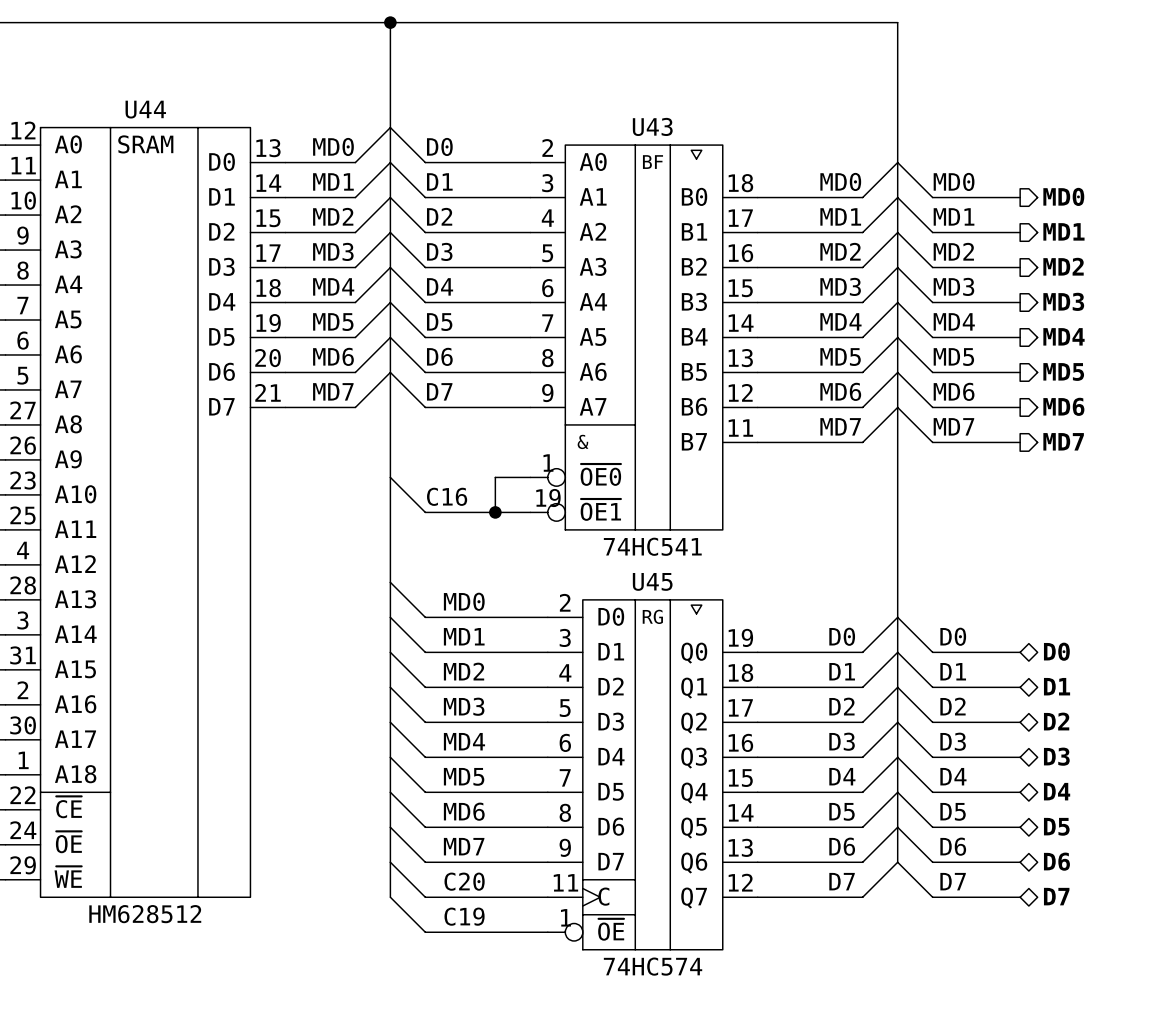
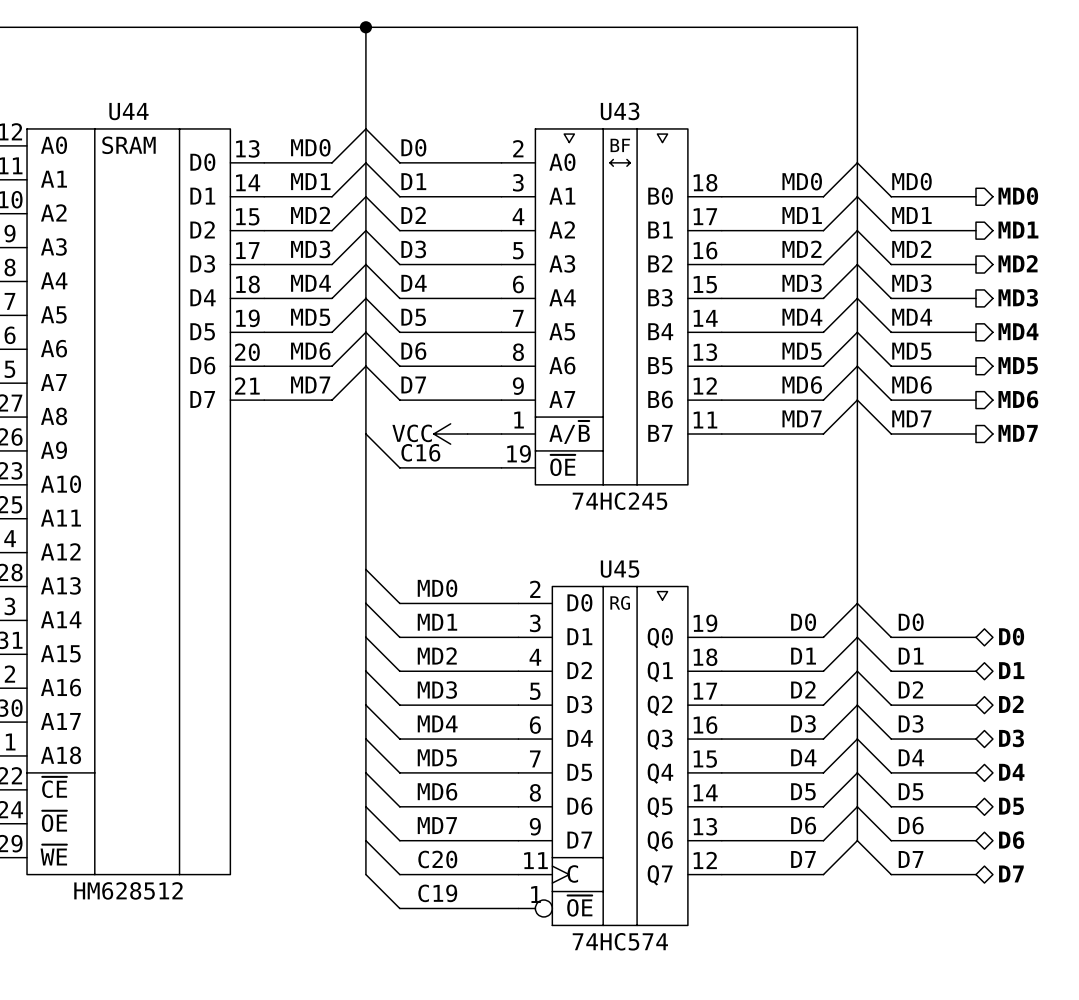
U43 symbol: [530, 145, 758, 530] -> [501, 128, 722, 485]
power symbol: none -> VCC (450, 434)
wire: none -> (467, 434) (501, 434)
wire: (390, 477) (425, 512) (530, 512) -> none
wire: (495, 477) (495, 512) -> (467, 467) (399, 467) (365, 434)
label position: C16 (447, 496) -> C16 (420, 452)
junction: (495, 512) -> none
U43 value: 74HC541 (652, 546) -> 74HC245 (619, 501)

